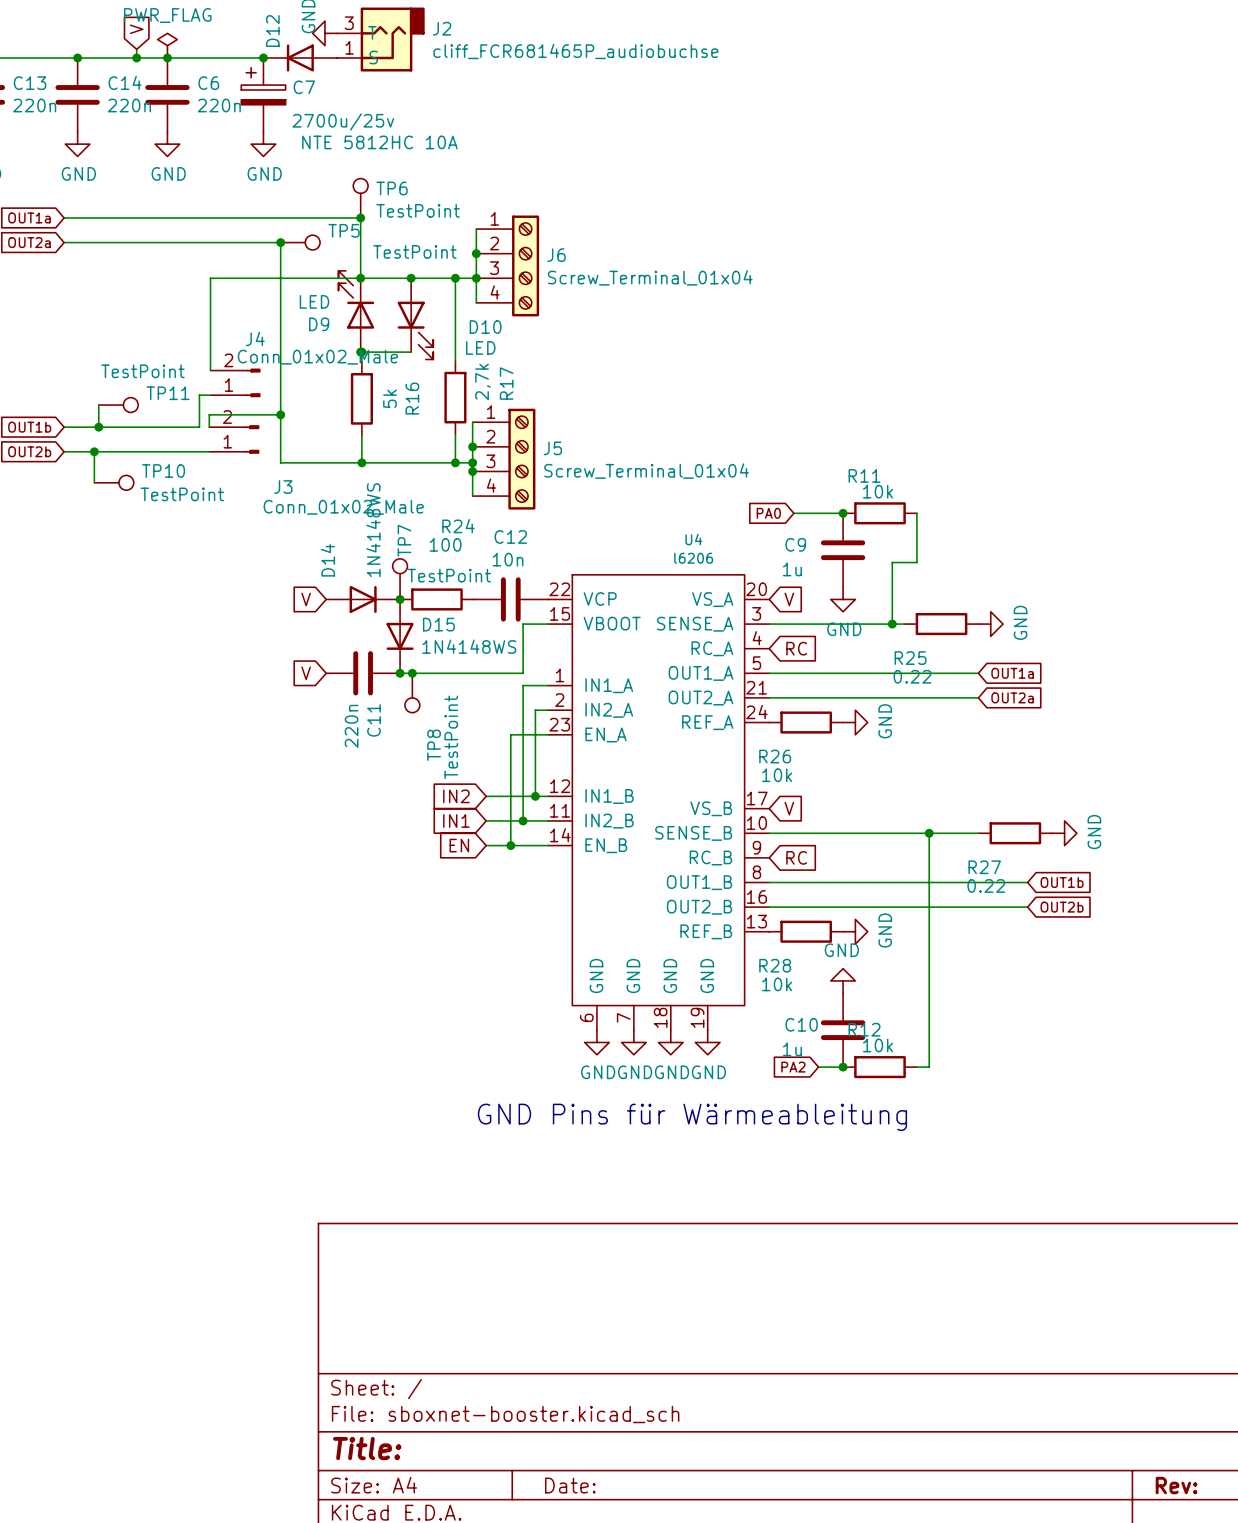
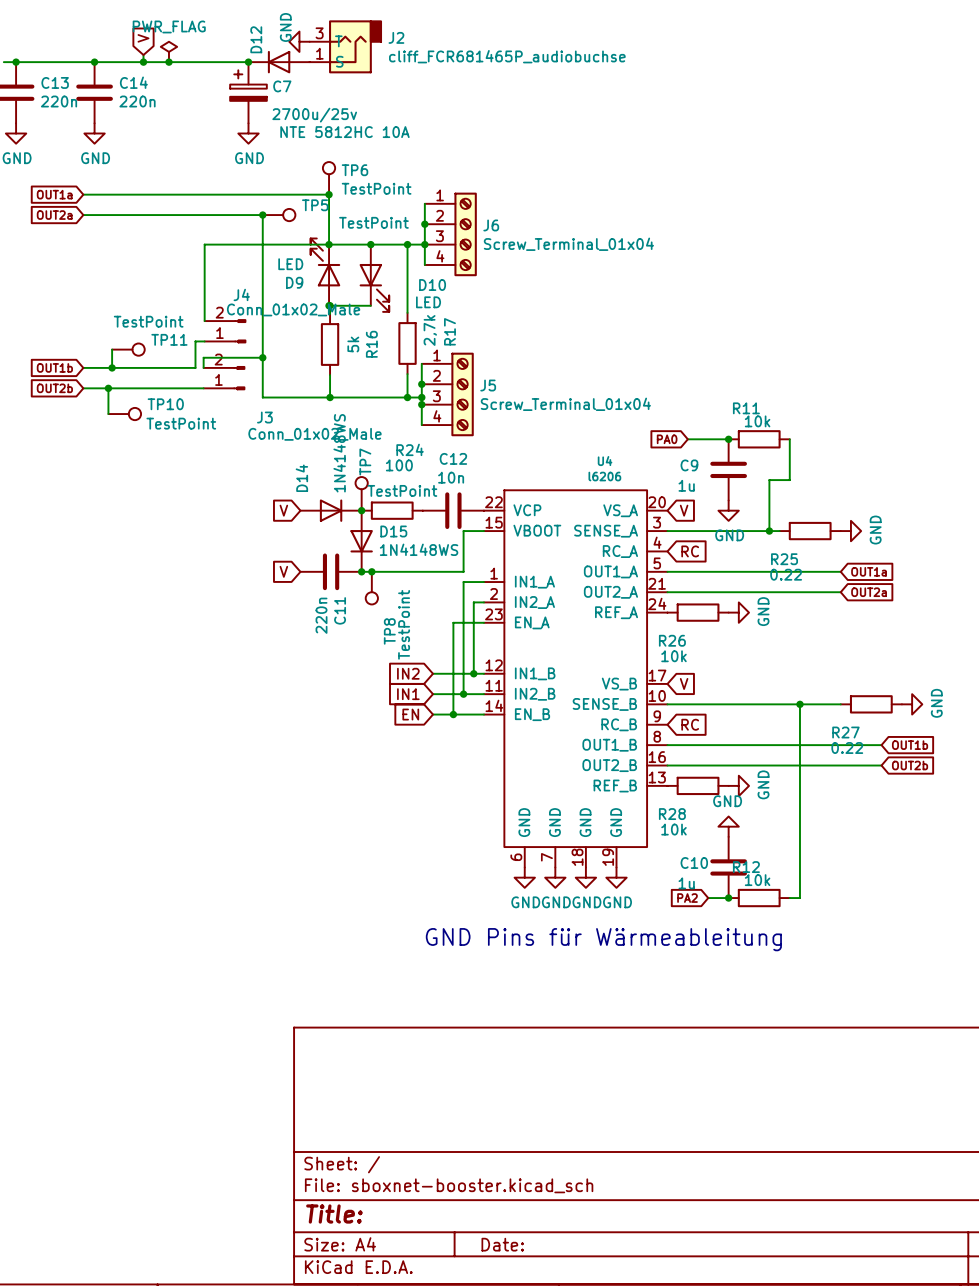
C6: 220n (167, 94) -> none
power symbol: GND (167, 144) -> none

